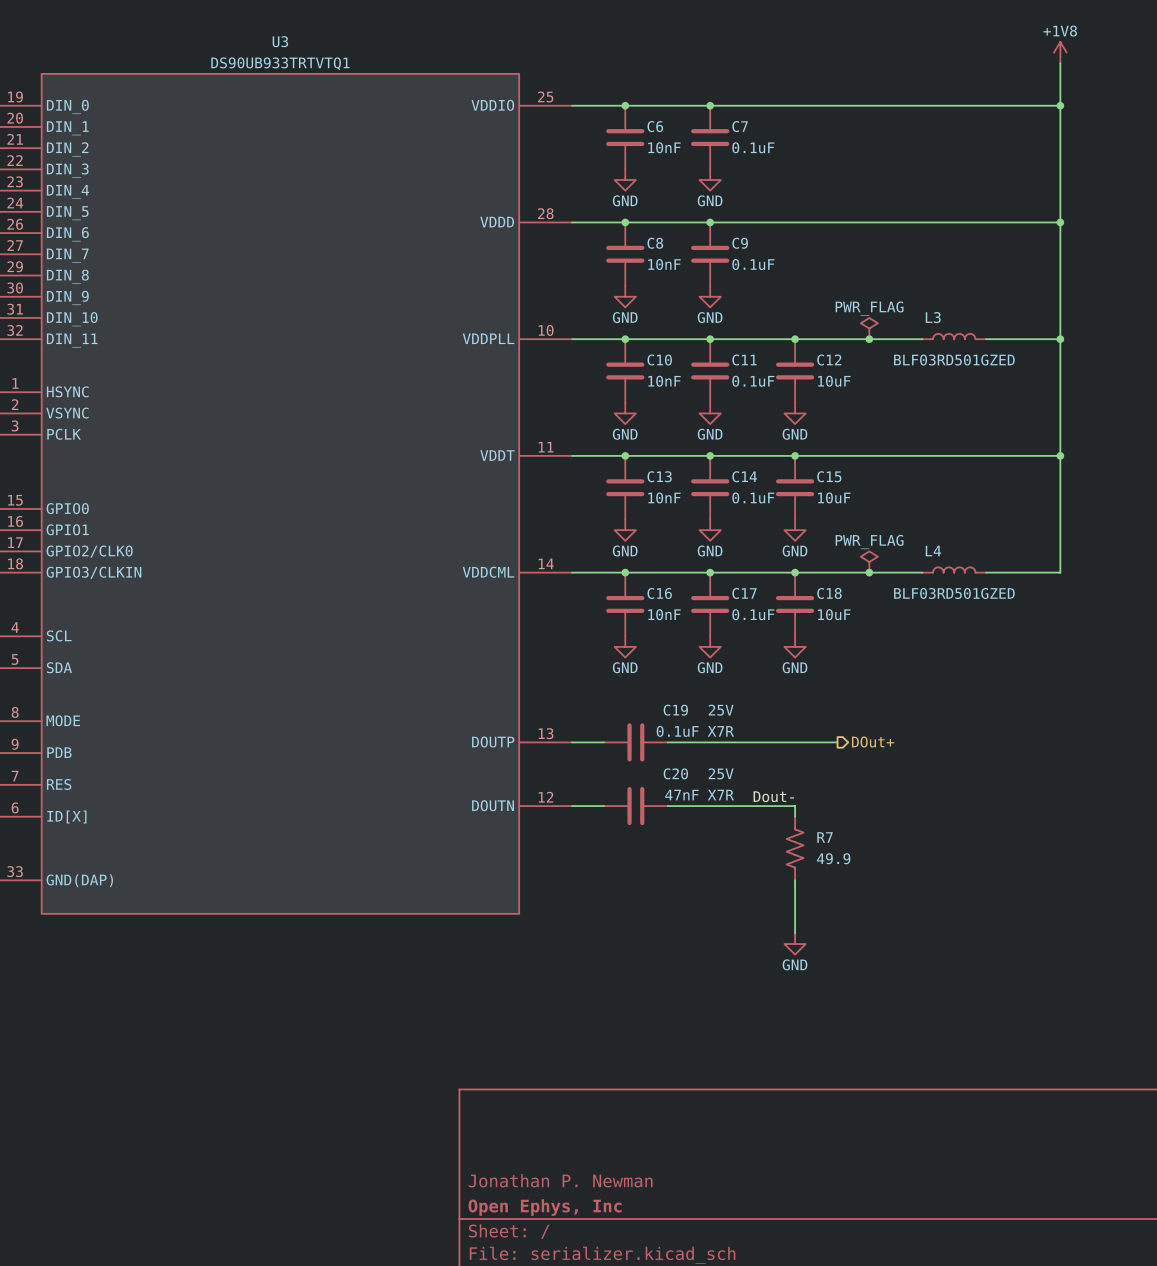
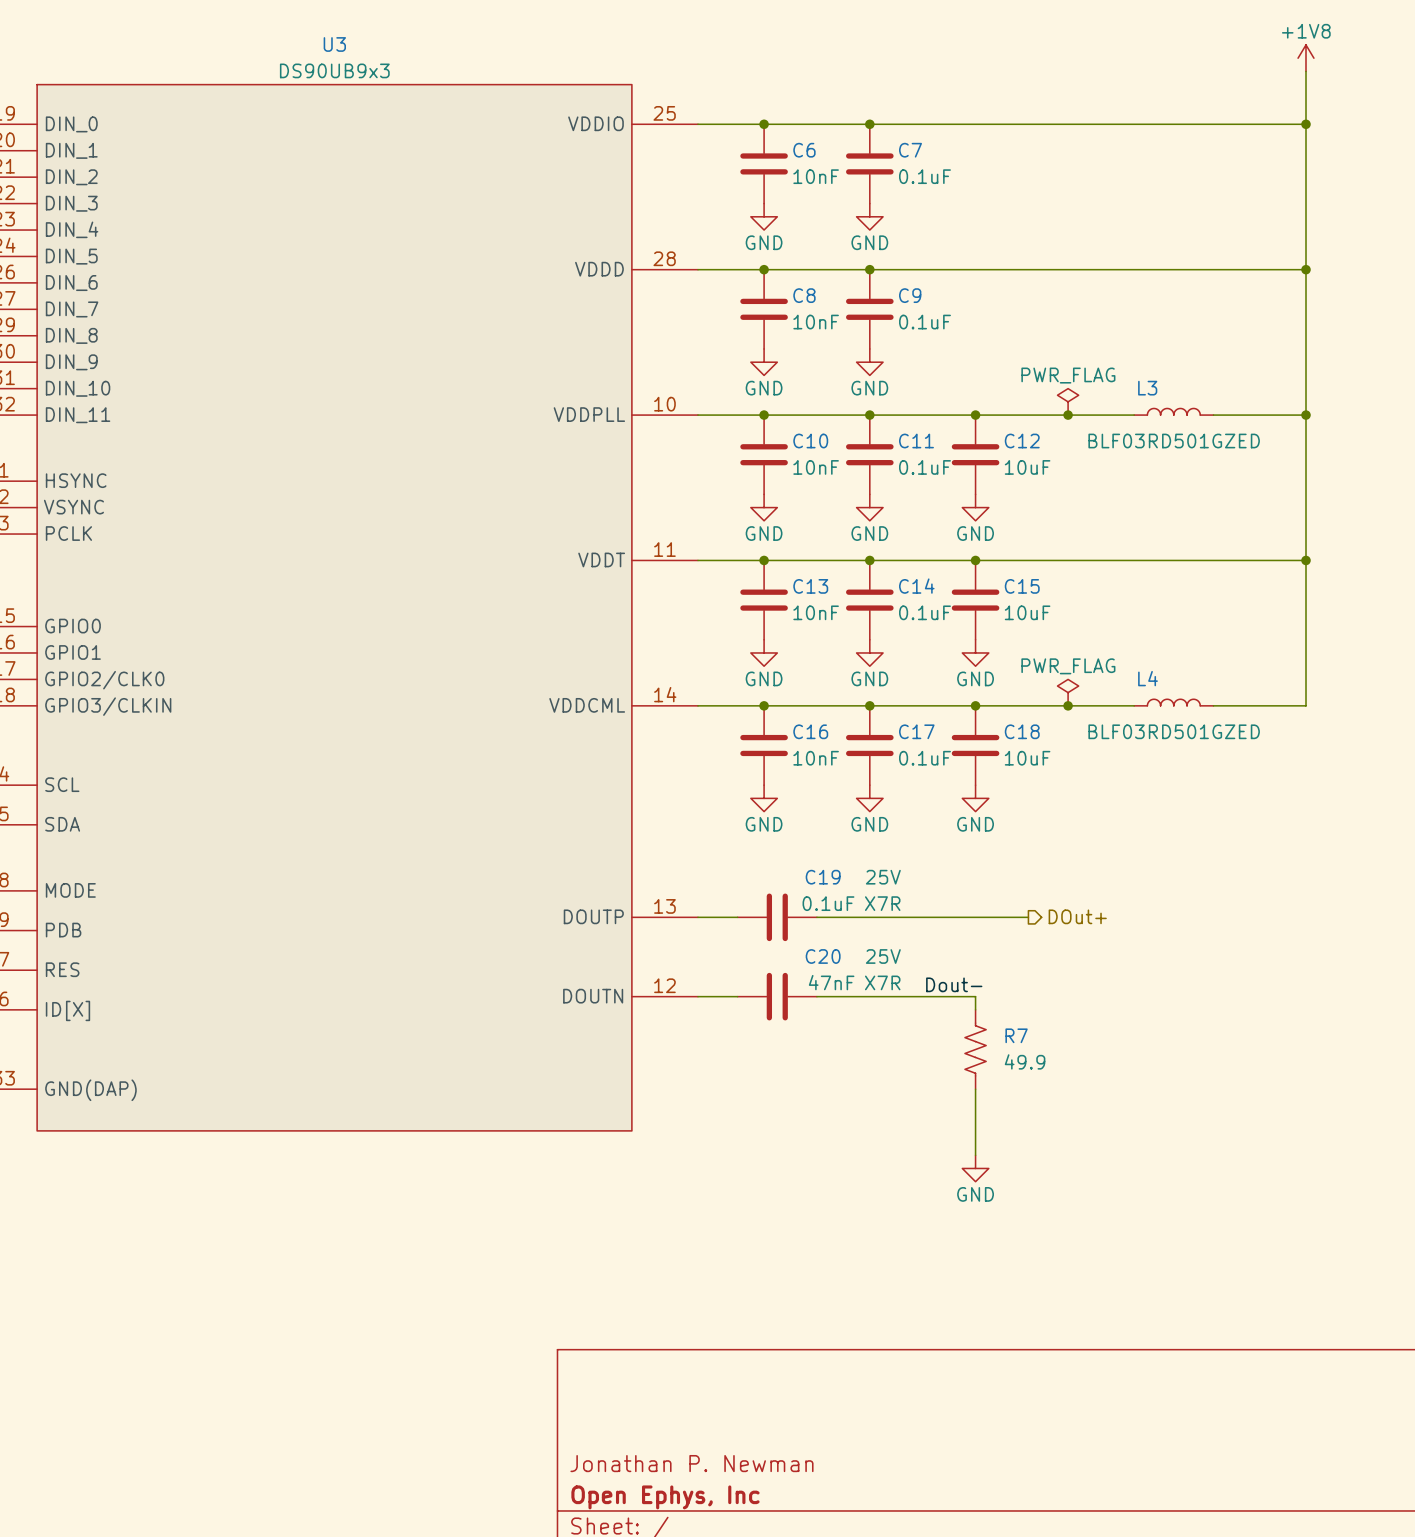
U3 value: DS90UB933TRTVTQ1 (280, 63) -> DS90UB9x3 (334, 70)

